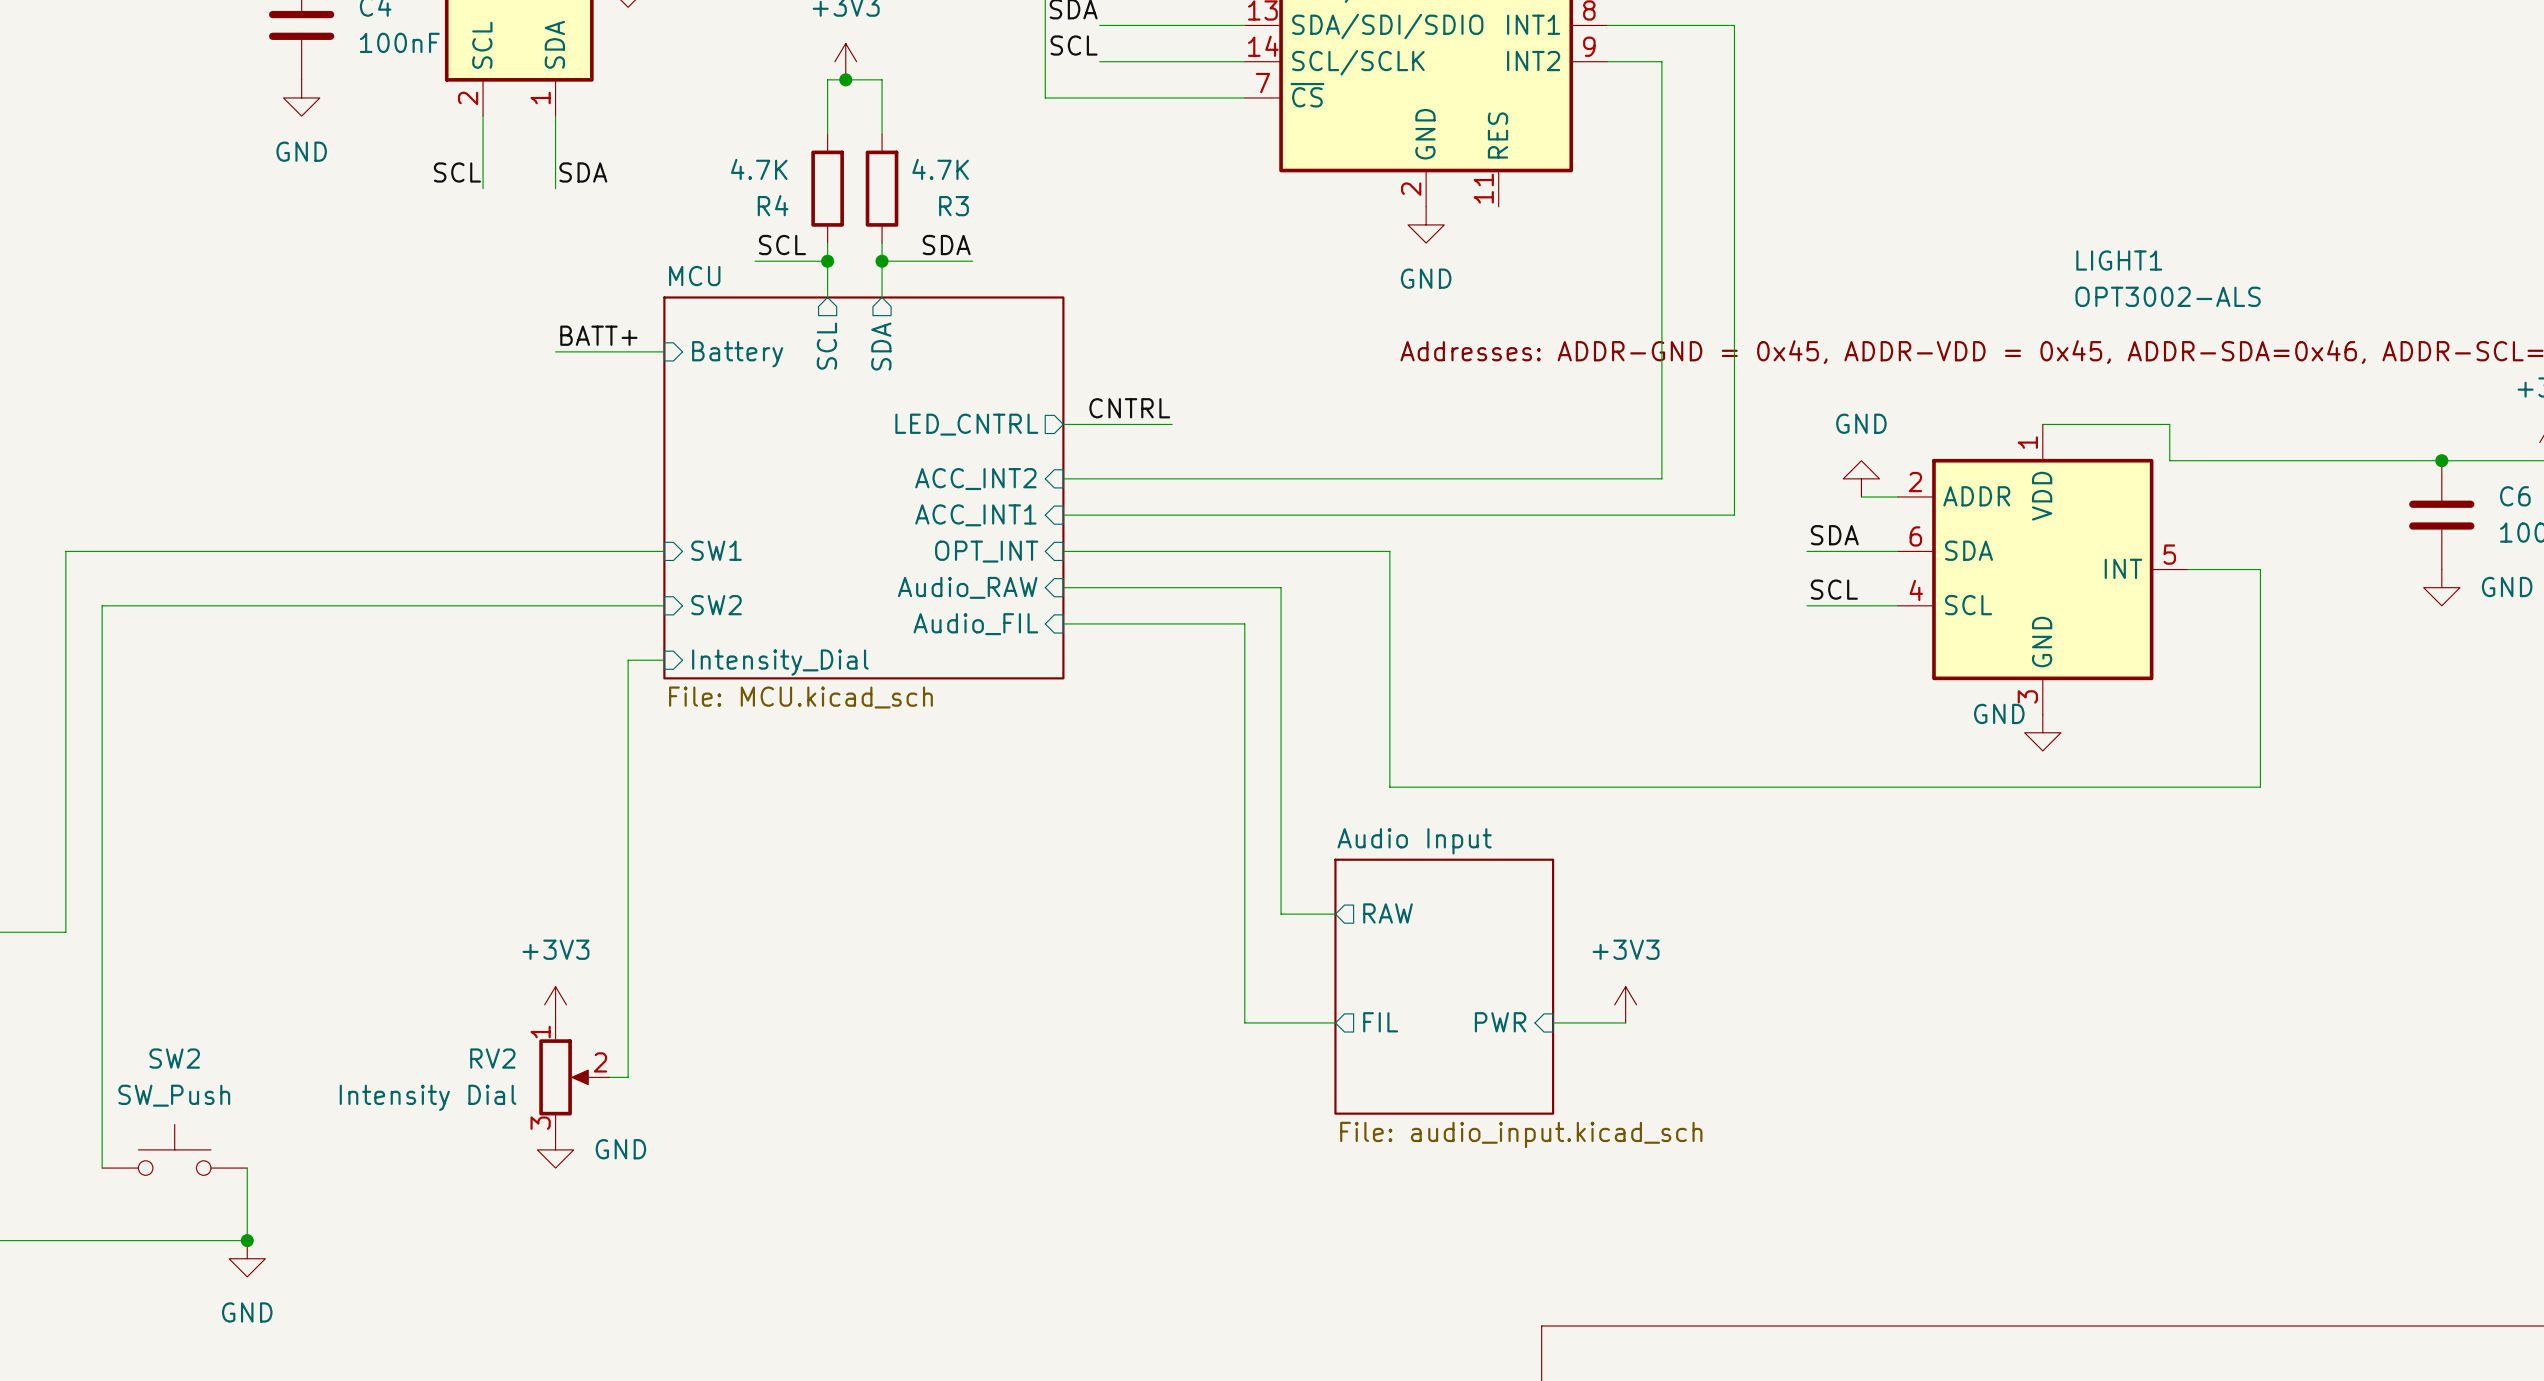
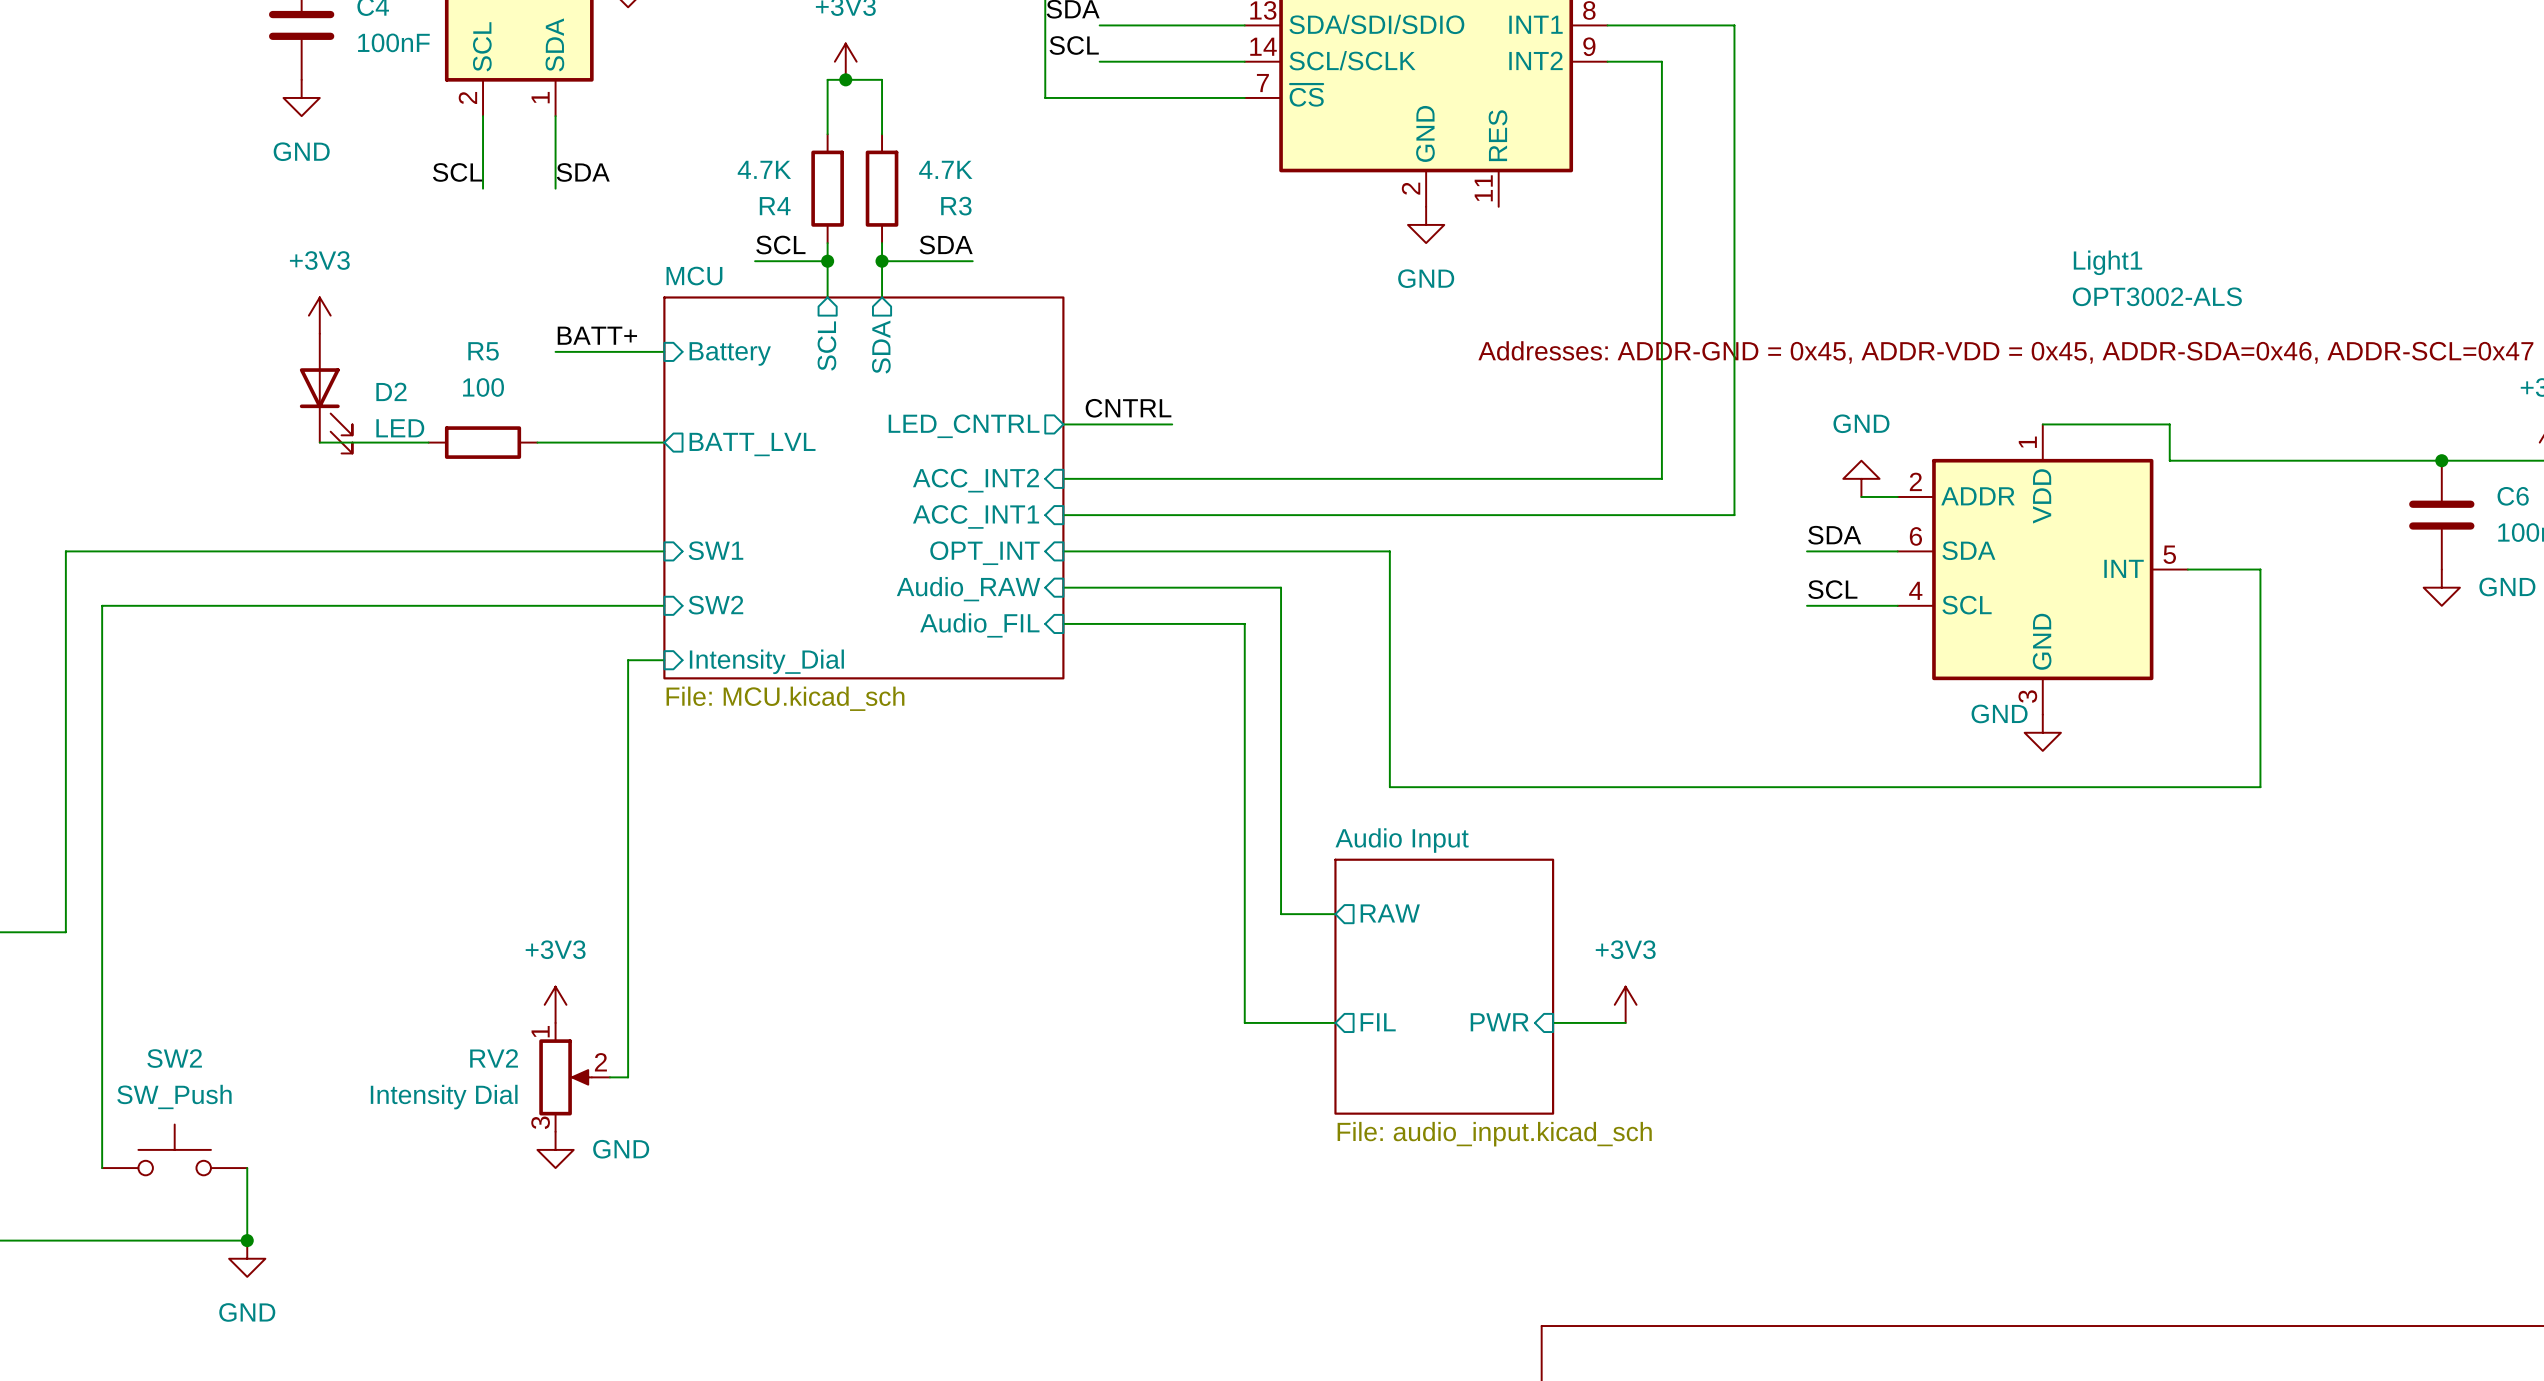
LIGHT1 name: LIGHT1 (2119, 260) -> Light1 (2107, 262)
power symbol: none -> +3V3 (319, 315)
D2: none -> LED (326, 393)
wire: none -> (319, 442) (428, 442)
R5: none -> 100 (483, 442)
wire: none -> (537, 442) (664, 442)
sheet pin: none -> BATT_LVL (752, 444)

